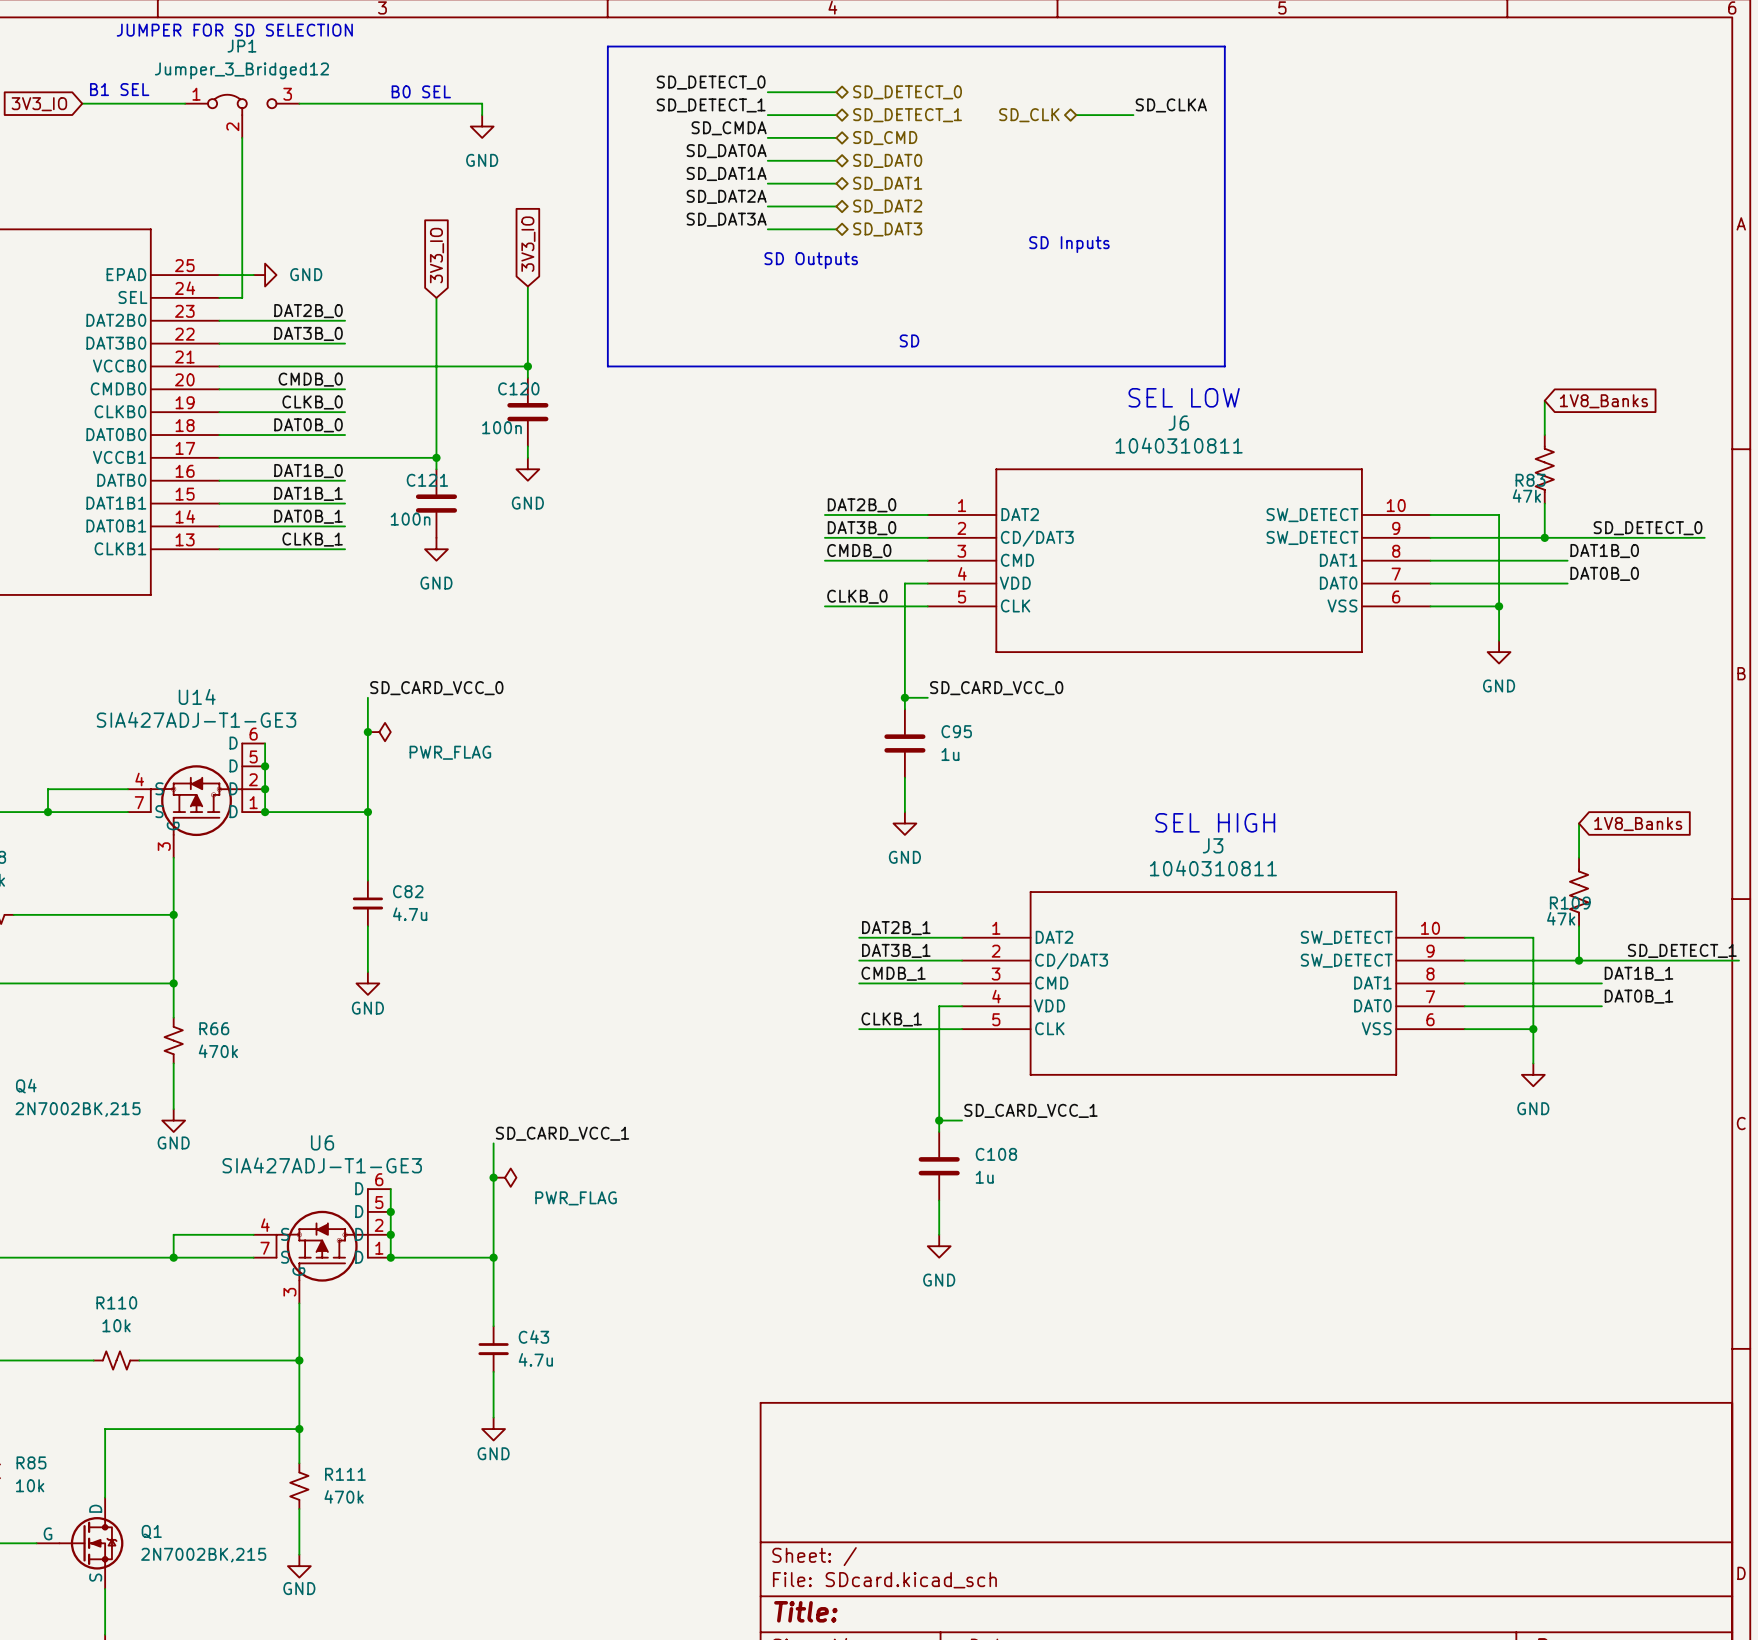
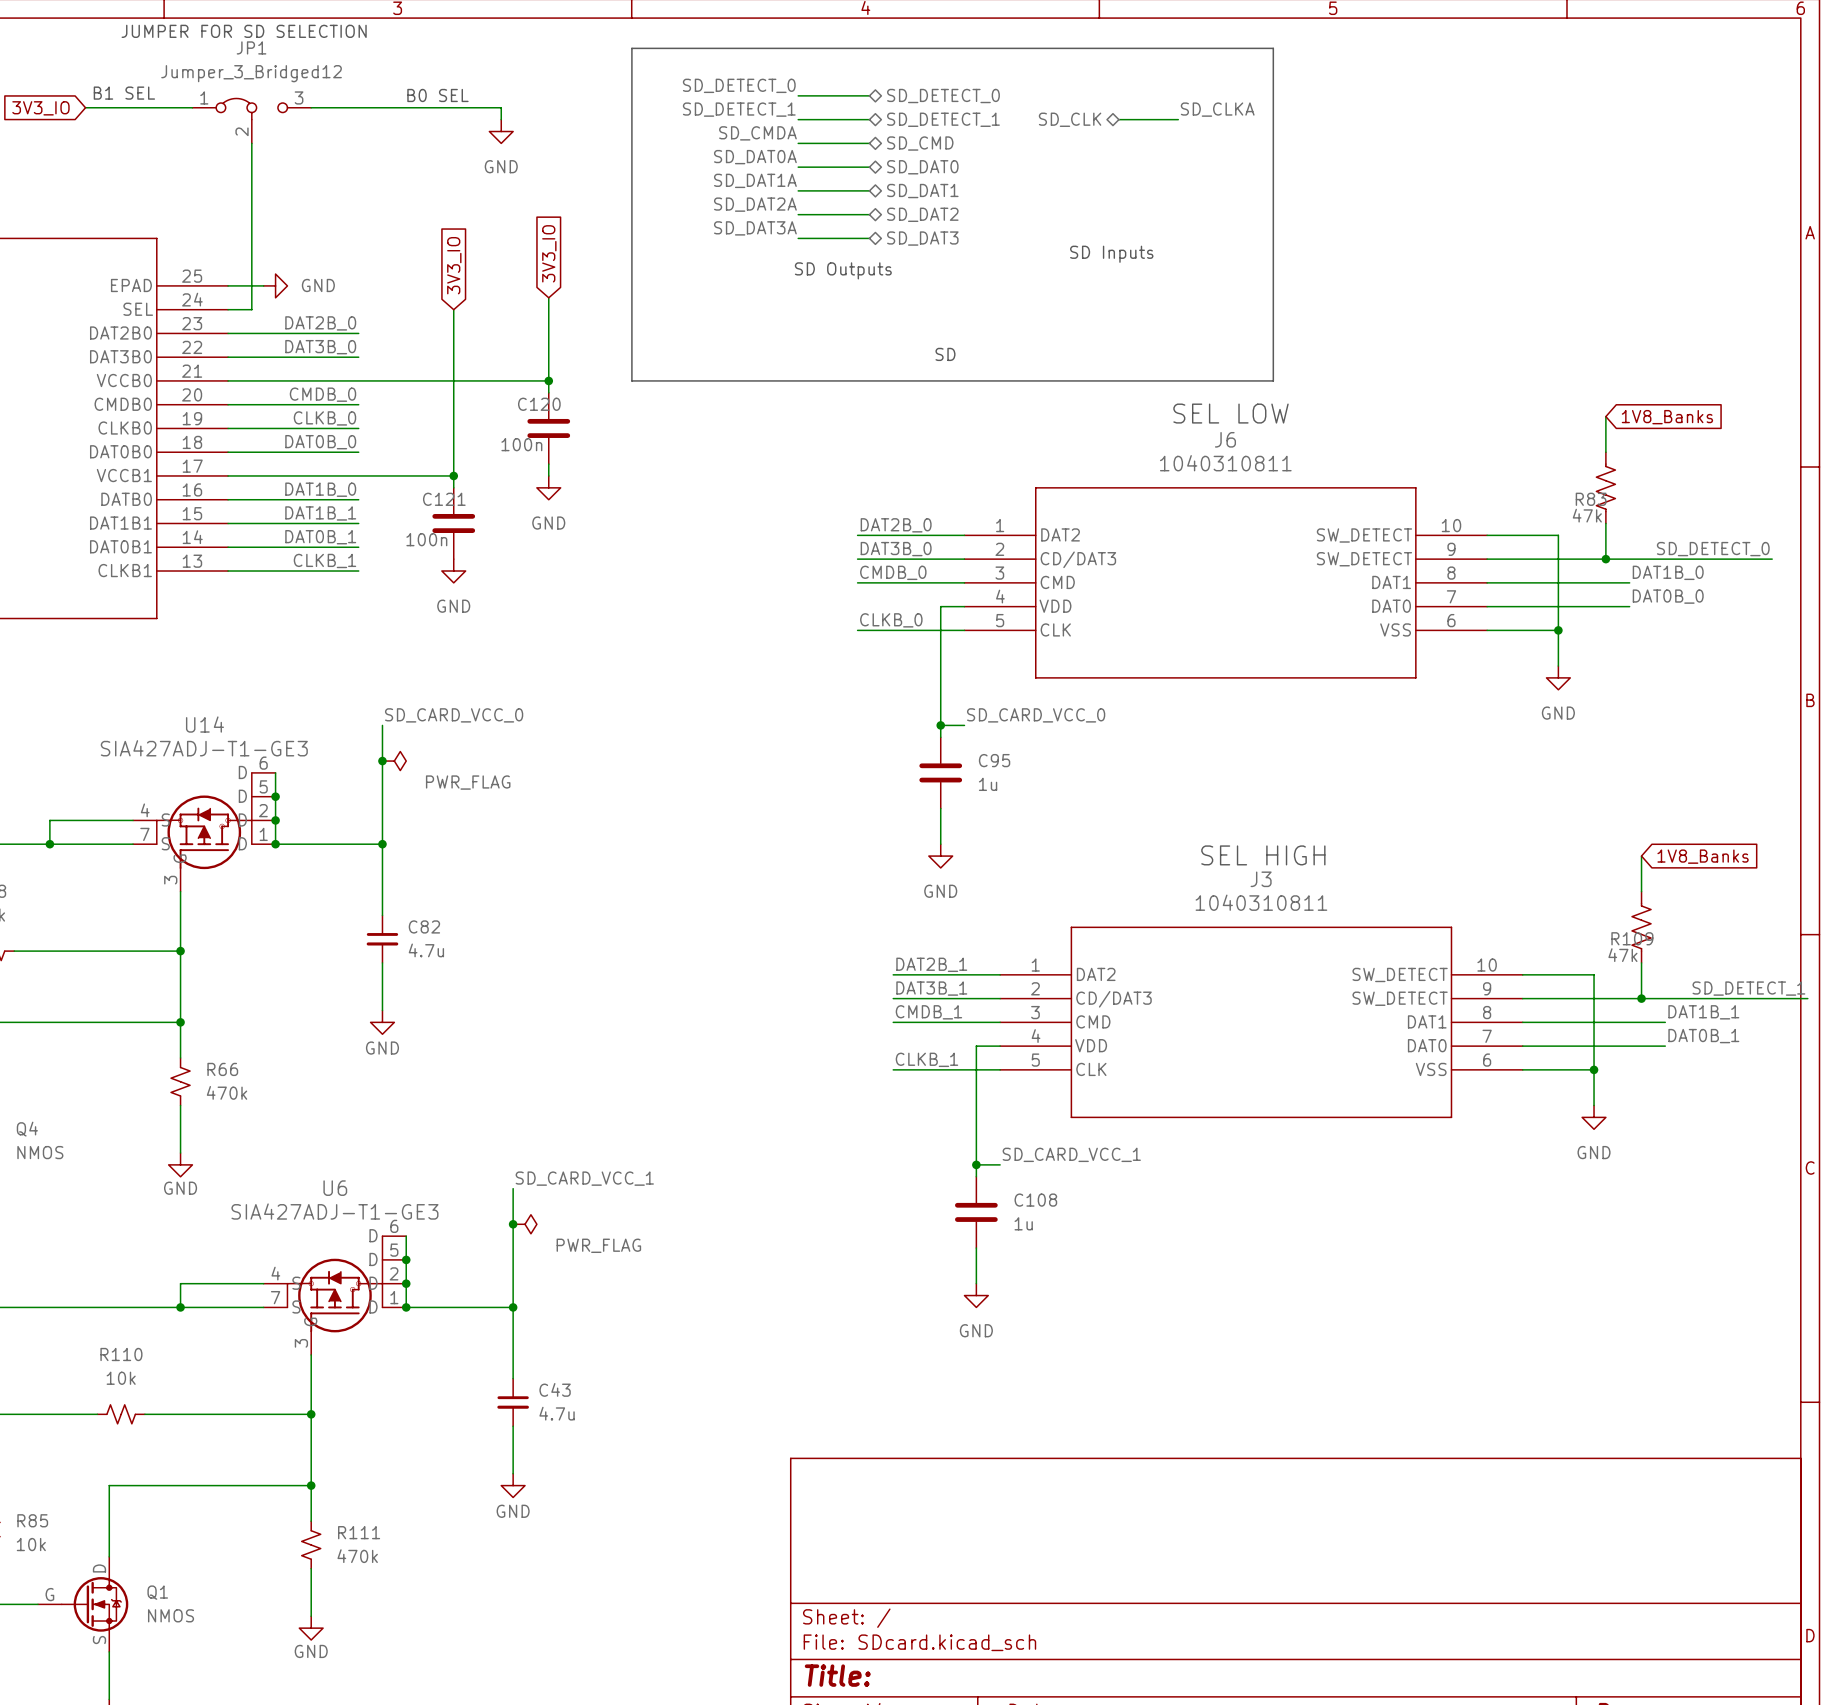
Q4 value: 2N7002BK,215 (78, 1109) -> NMOS (40, 1152)
Q1 value: 2N7002BK,215 (203, 1555) -> NMOS (171, 1615)

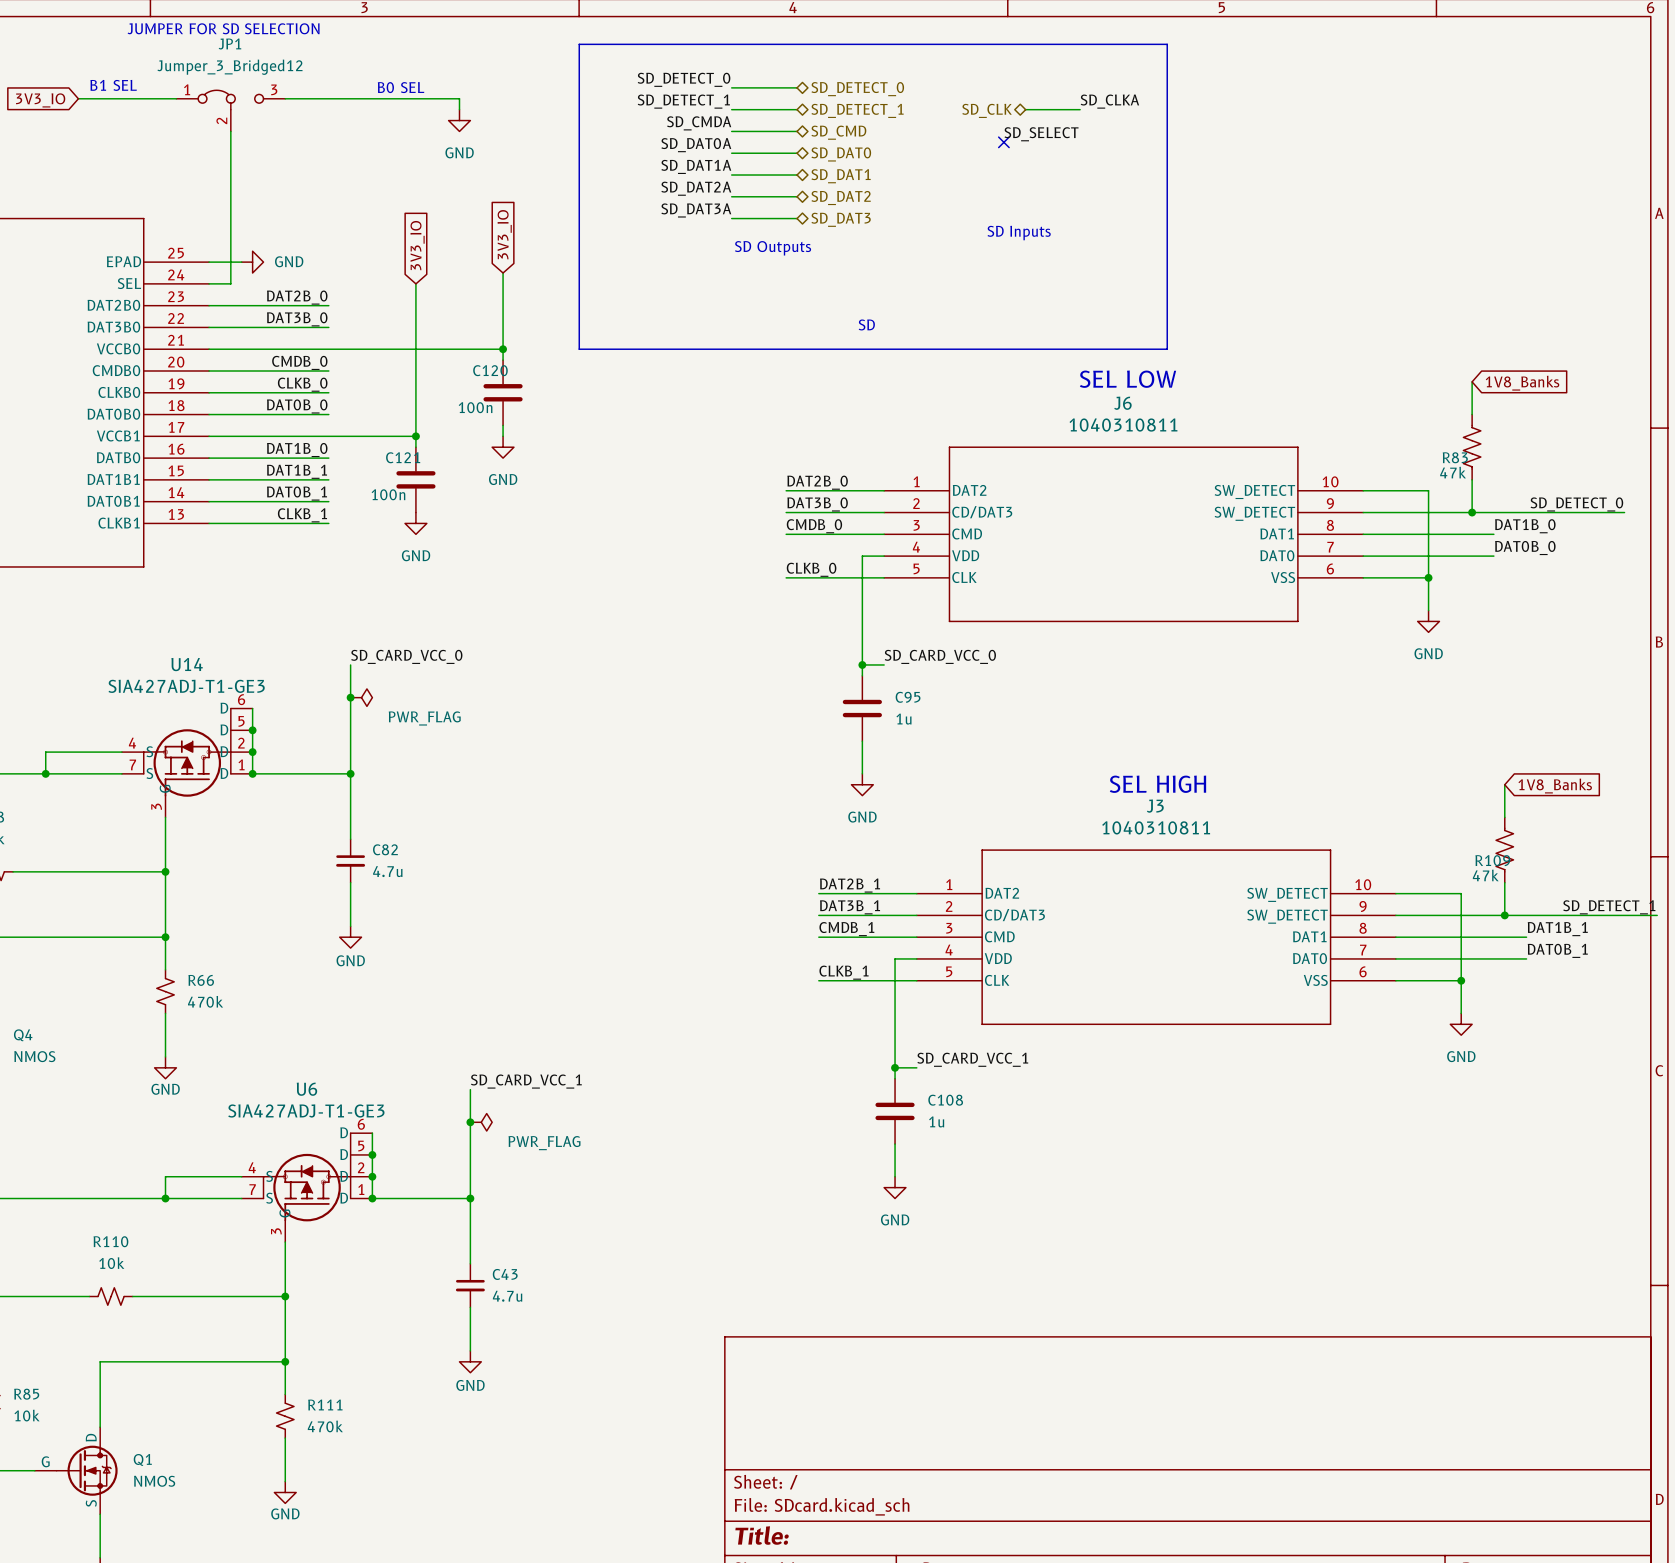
label: none -> SD_SELECT (1041, 134)
no-connect mark: none -> (1003, 142)

